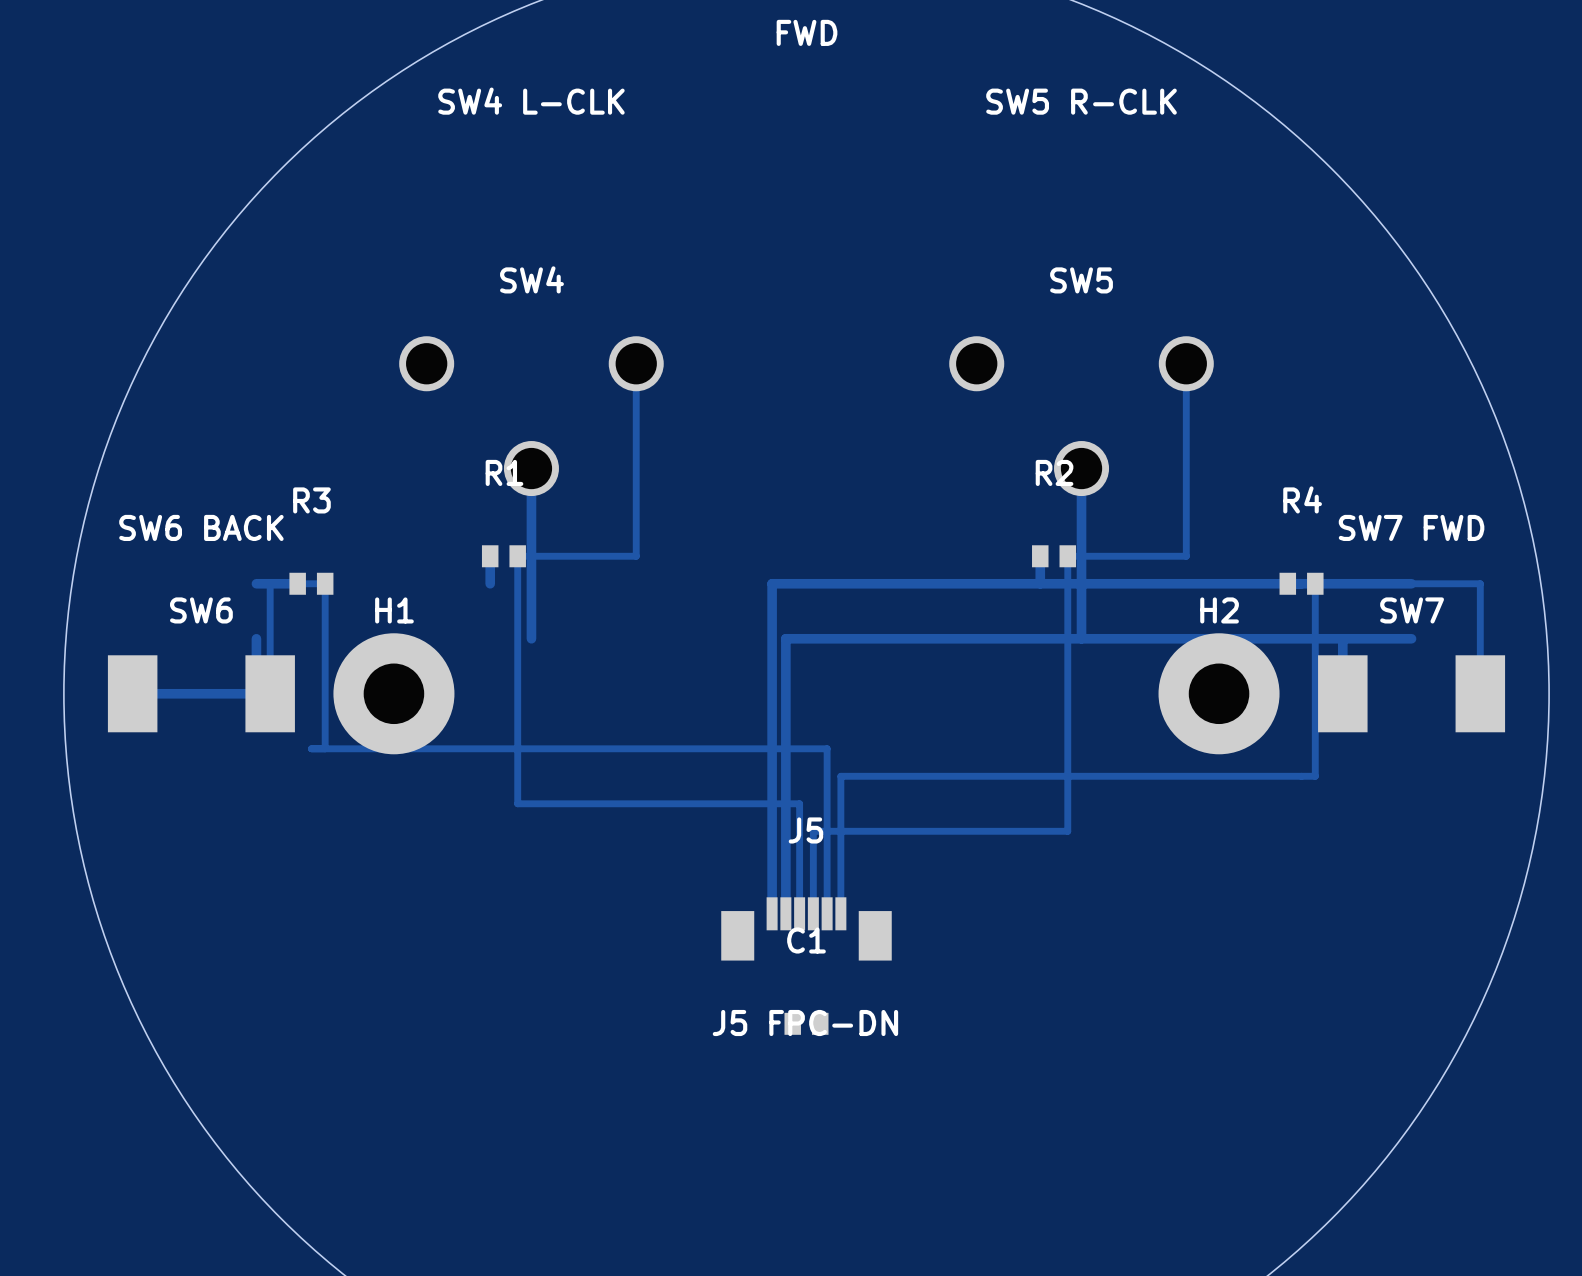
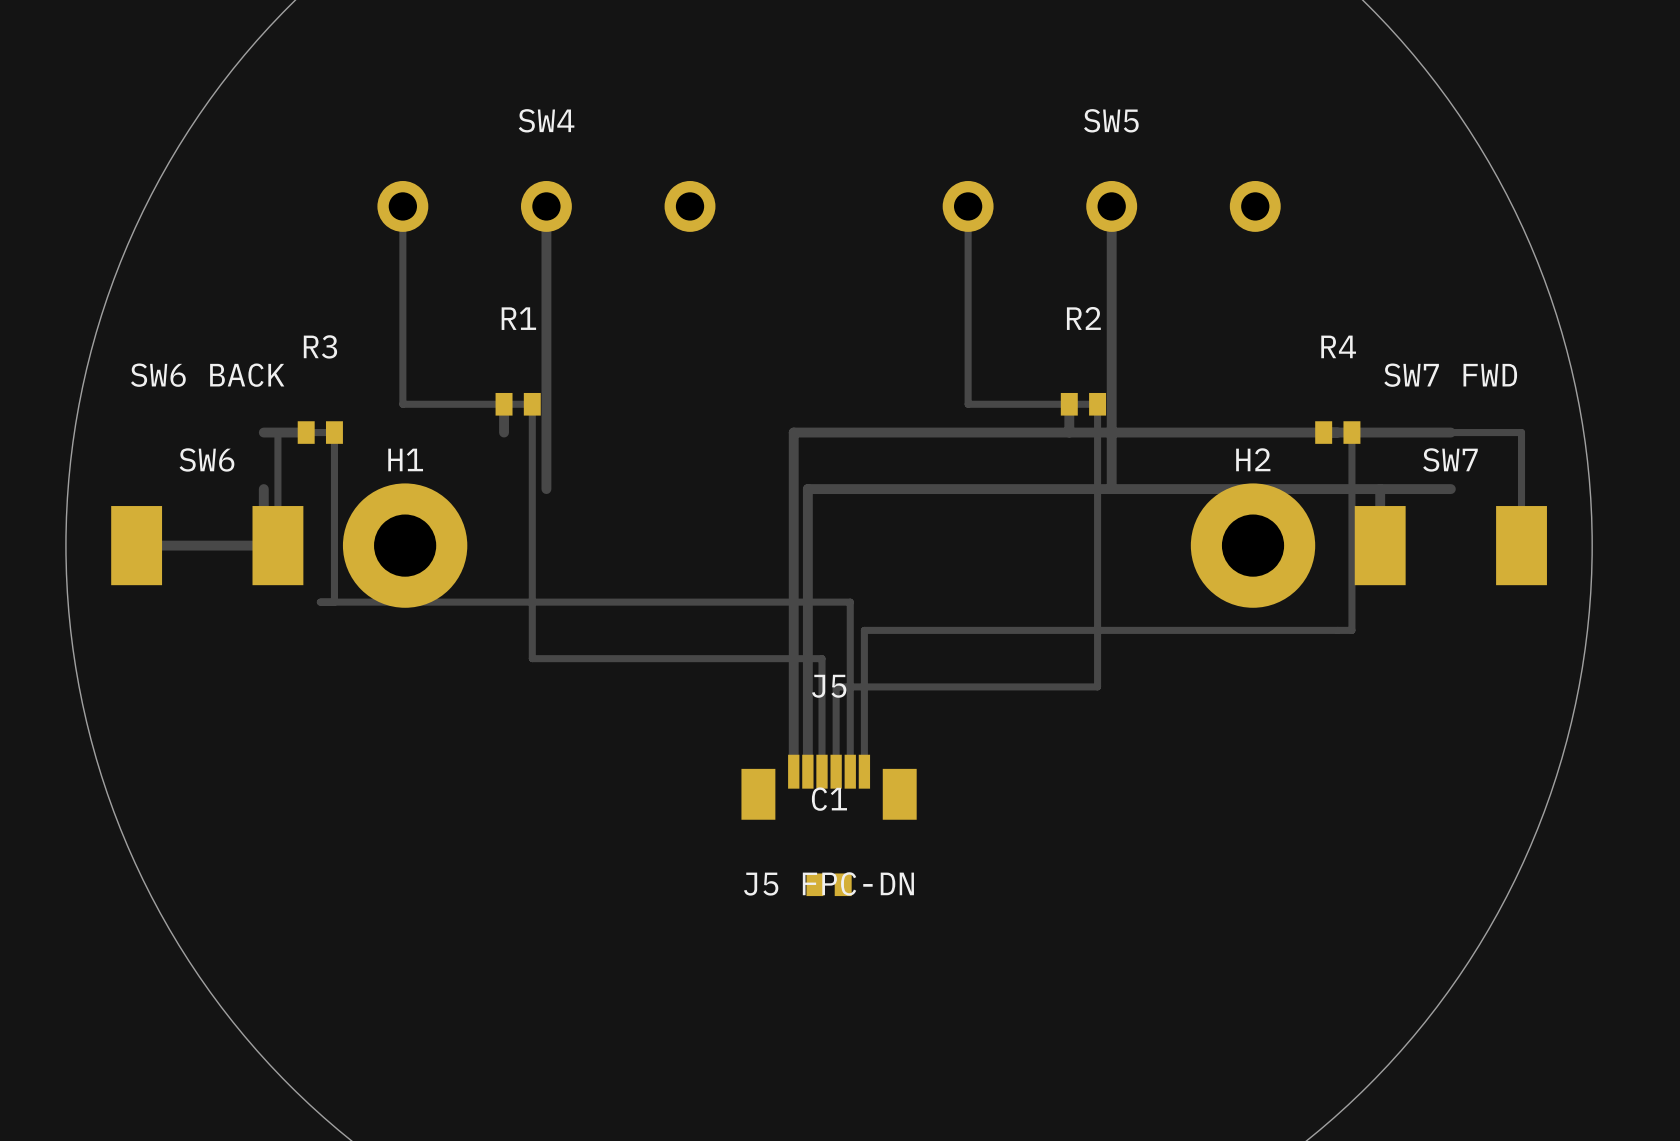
SW4 footprint: [399, 336, 664, 497] -> [377, 181, 716, 232]
SW5 footprint: [949, 336, 1214, 497] -> [942, 181, 1281, 232]
track: none -> (546, 206) (546, 314)
track: (636, 363) (636, 556) (517, 556) -> (402, 206) (402, 404) (532, 404)
track: none -> (1111, 206) (1111, 314)
track: (1186, 363) (1186, 556) (1067, 556) -> (968, 206) (968, 404) (1097, 404)

